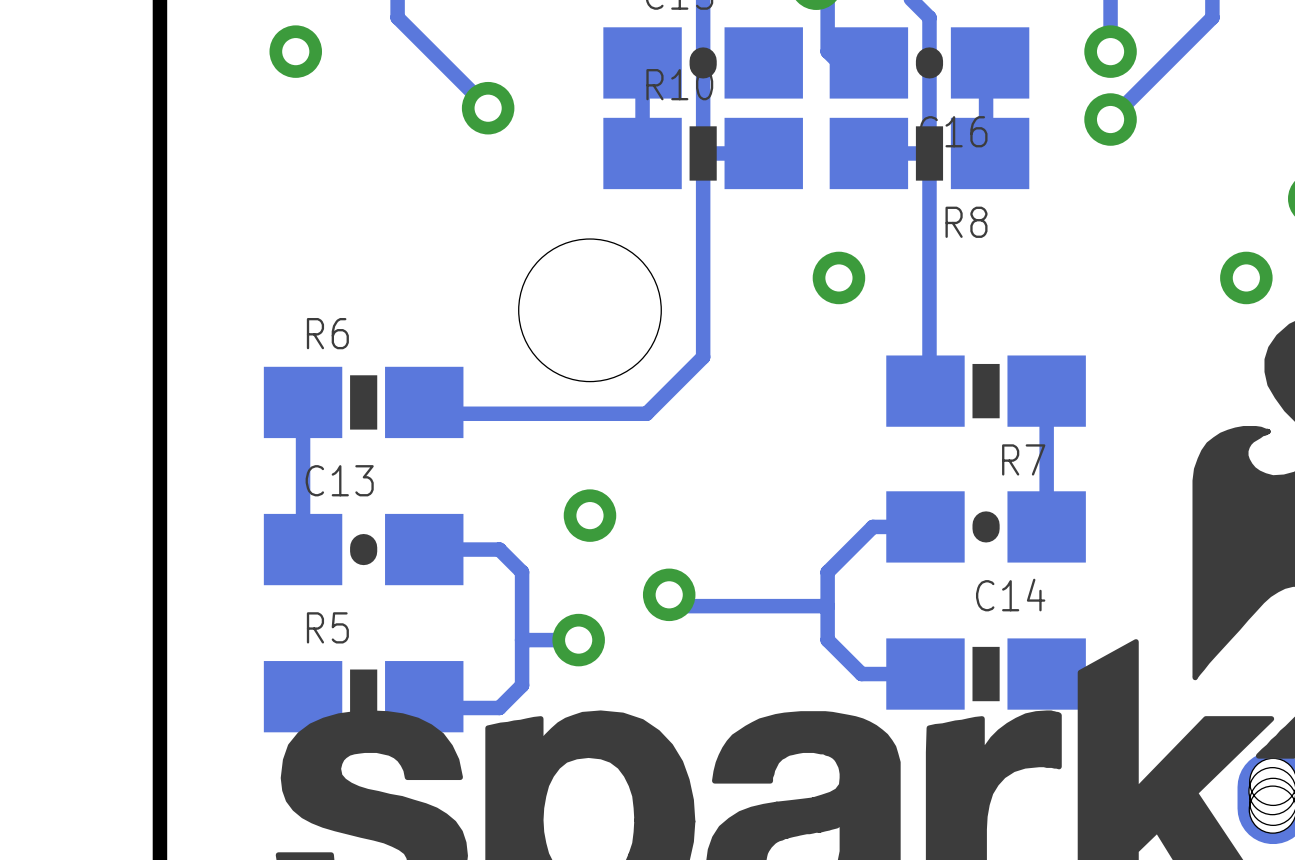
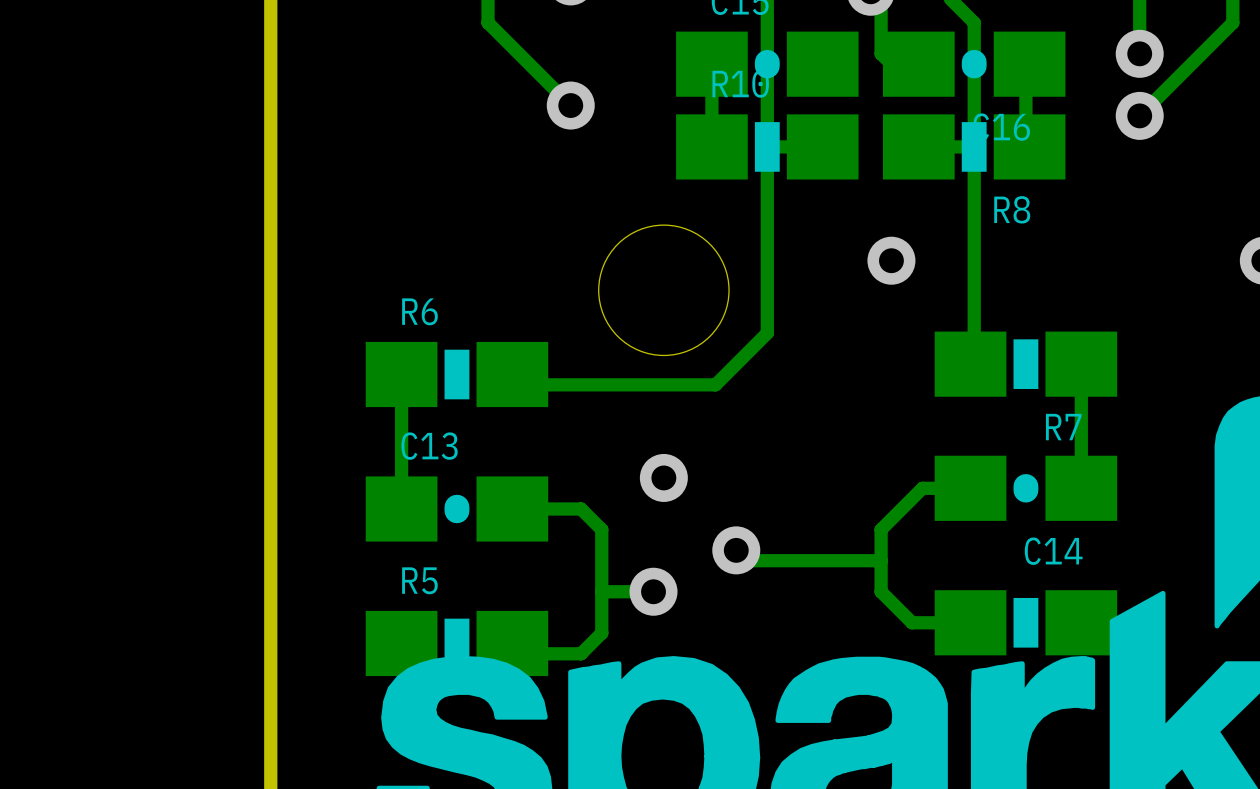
via: (295, 51) -> none

